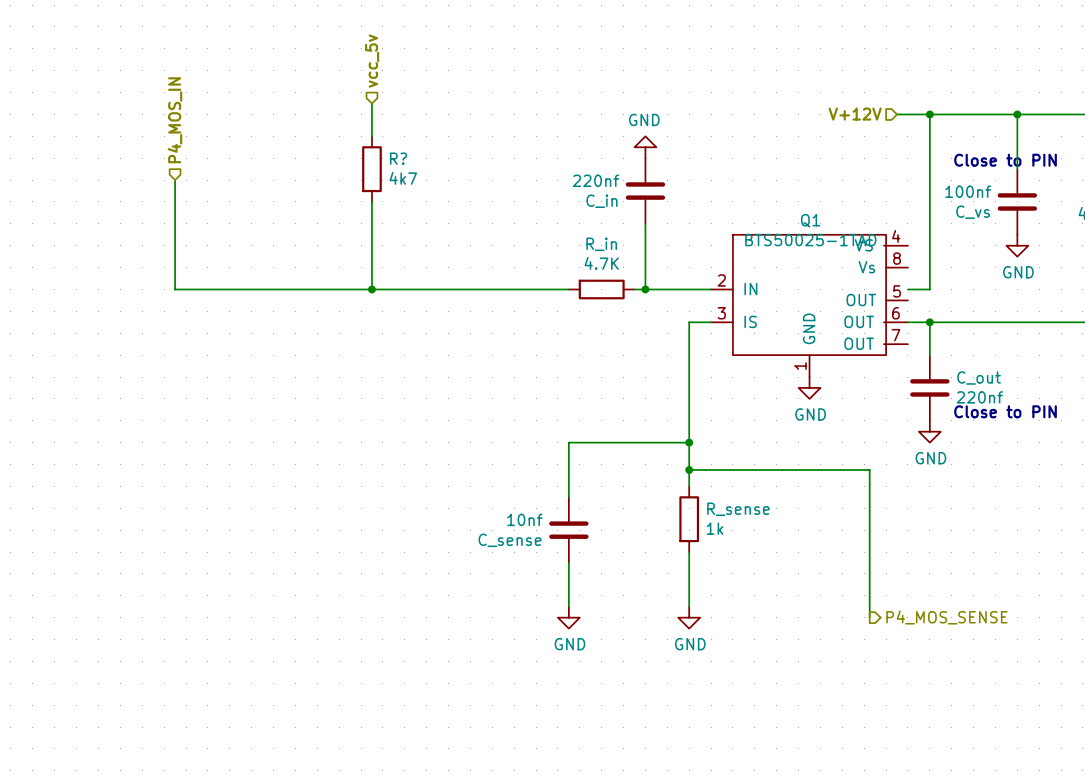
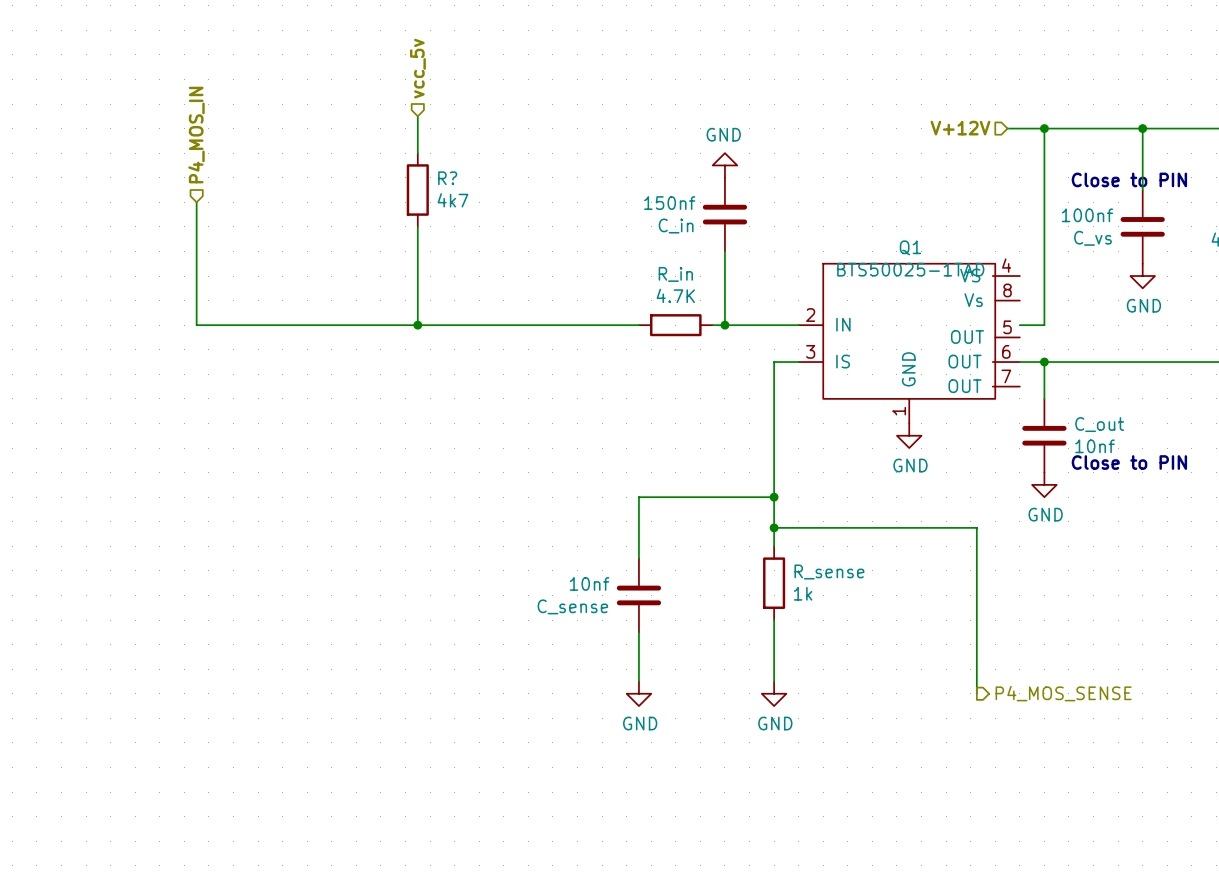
C_in value: 220nf (595, 180) -> 150nf (669, 203)
C_out value: 220nf (979, 397) -> 10nf (1094, 446)

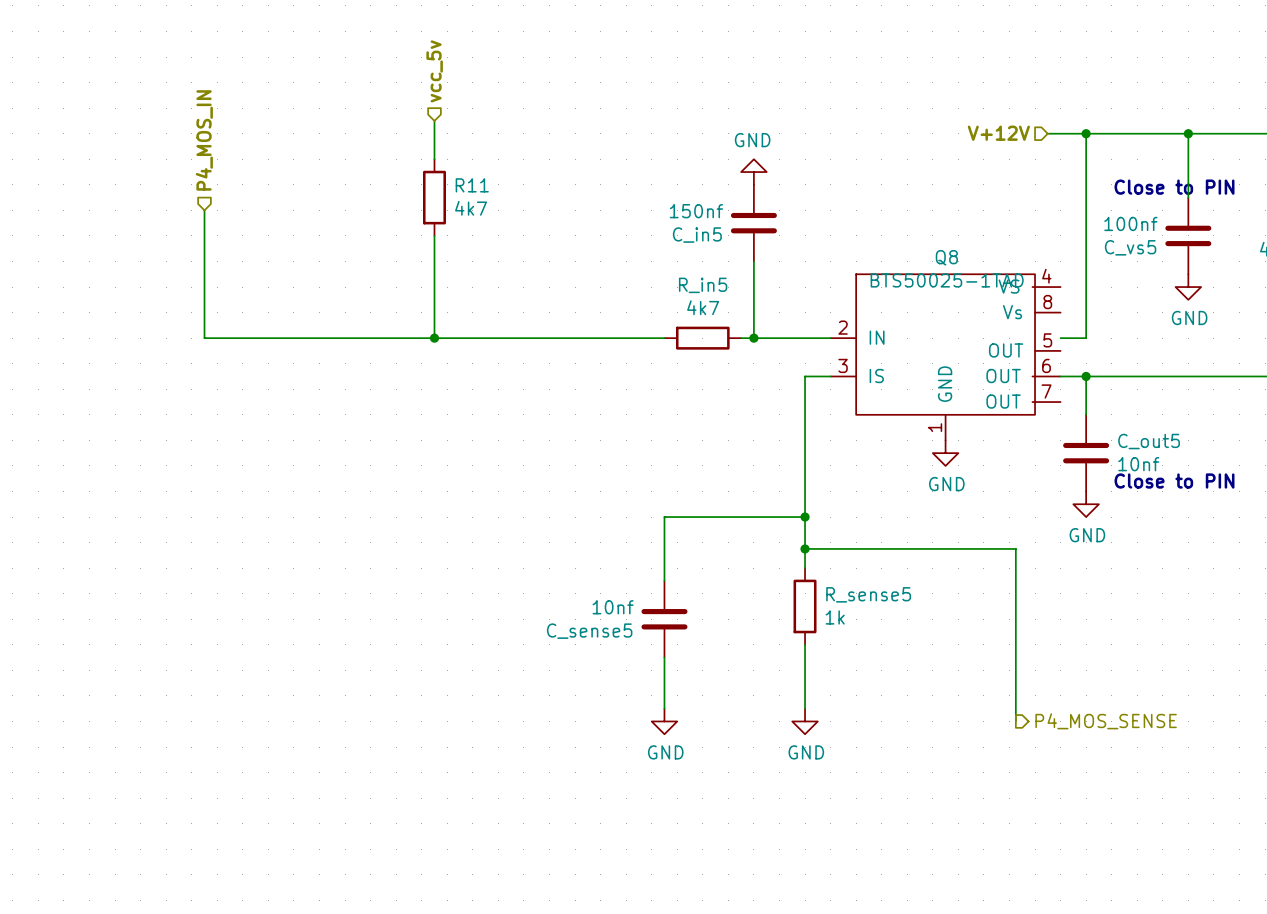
R? name: R? (447, 178) -> R11 (472, 185)
C_in name: C_in (676, 226) -> C_in5 (697, 235)
C_vs name: C_vs (1092, 238) -> C_vs5 (1130, 247)
Q1 name: Q1 (910, 247) -> Q8 (946, 257)
R_in name: R_in (675, 274) -> R_in5 (703, 285)
R_in value: 4.7K (675, 295) -> 4k7 (703, 307)
C_out name: C_out (1099, 424) -> C_out5 (1149, 441)
R_sense name: R_sense (829, 572) -> R_sense5 (868, 594)
C_sense name: C_sense (572, 606) -> C_sense5 (589, 631)

